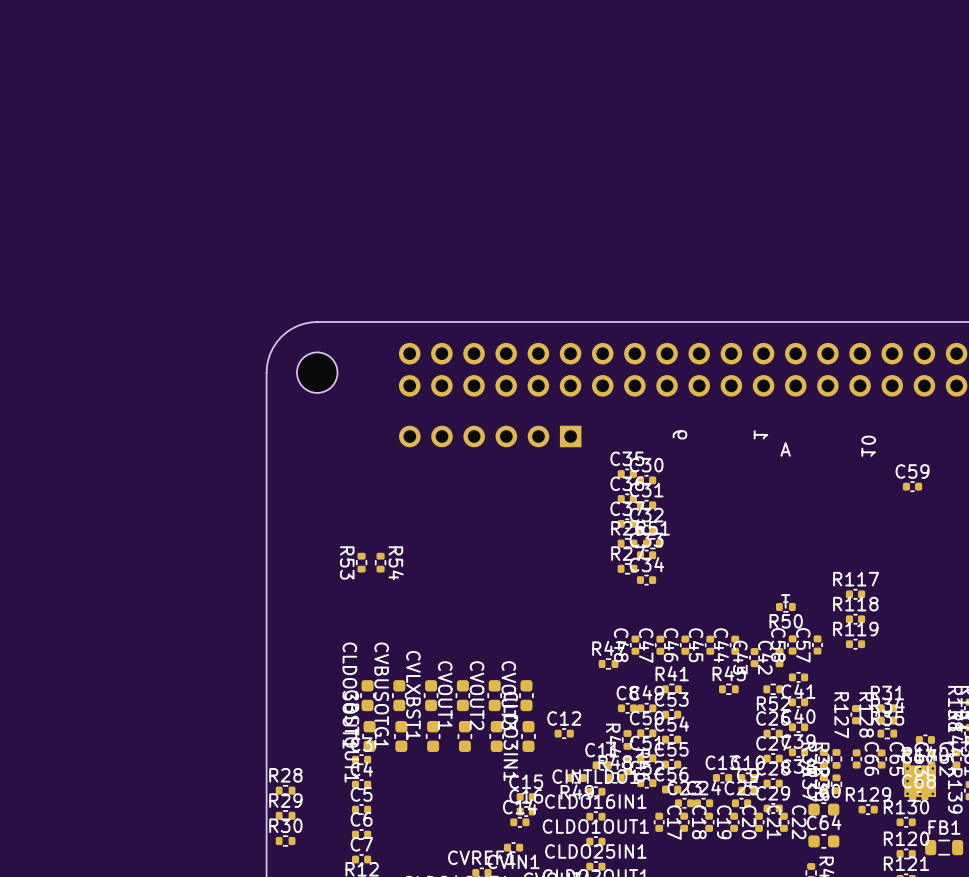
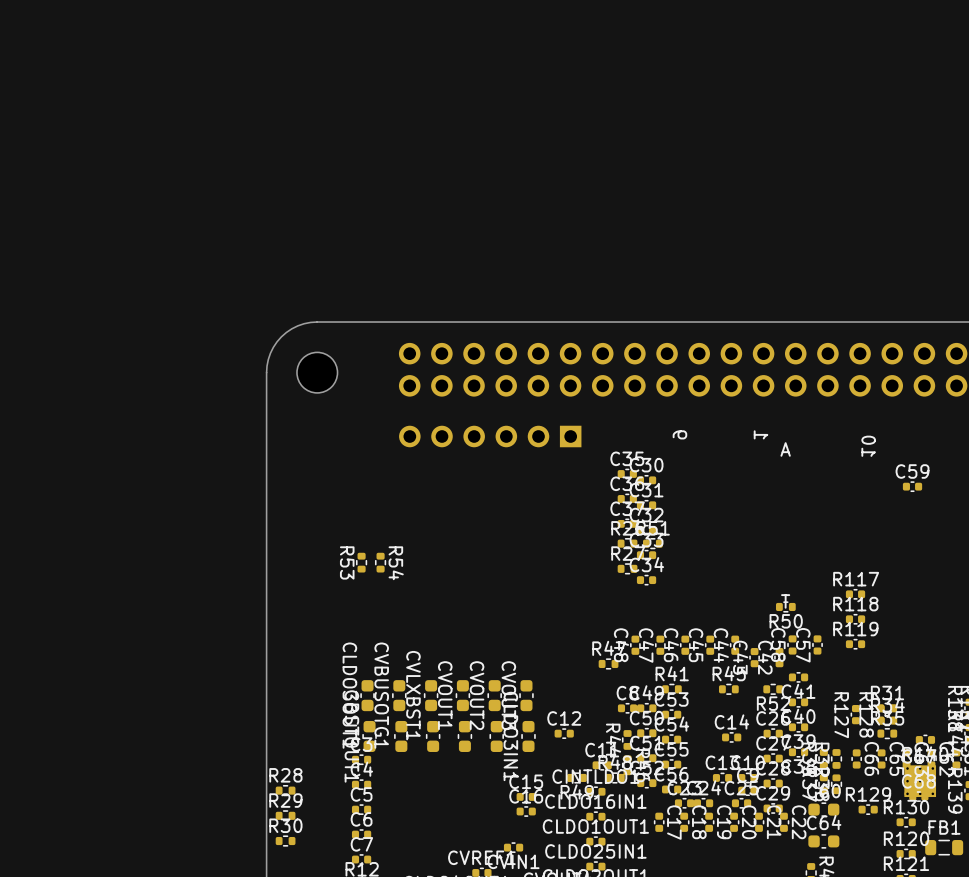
C14 position: (519, 822) -> (731, 737)

